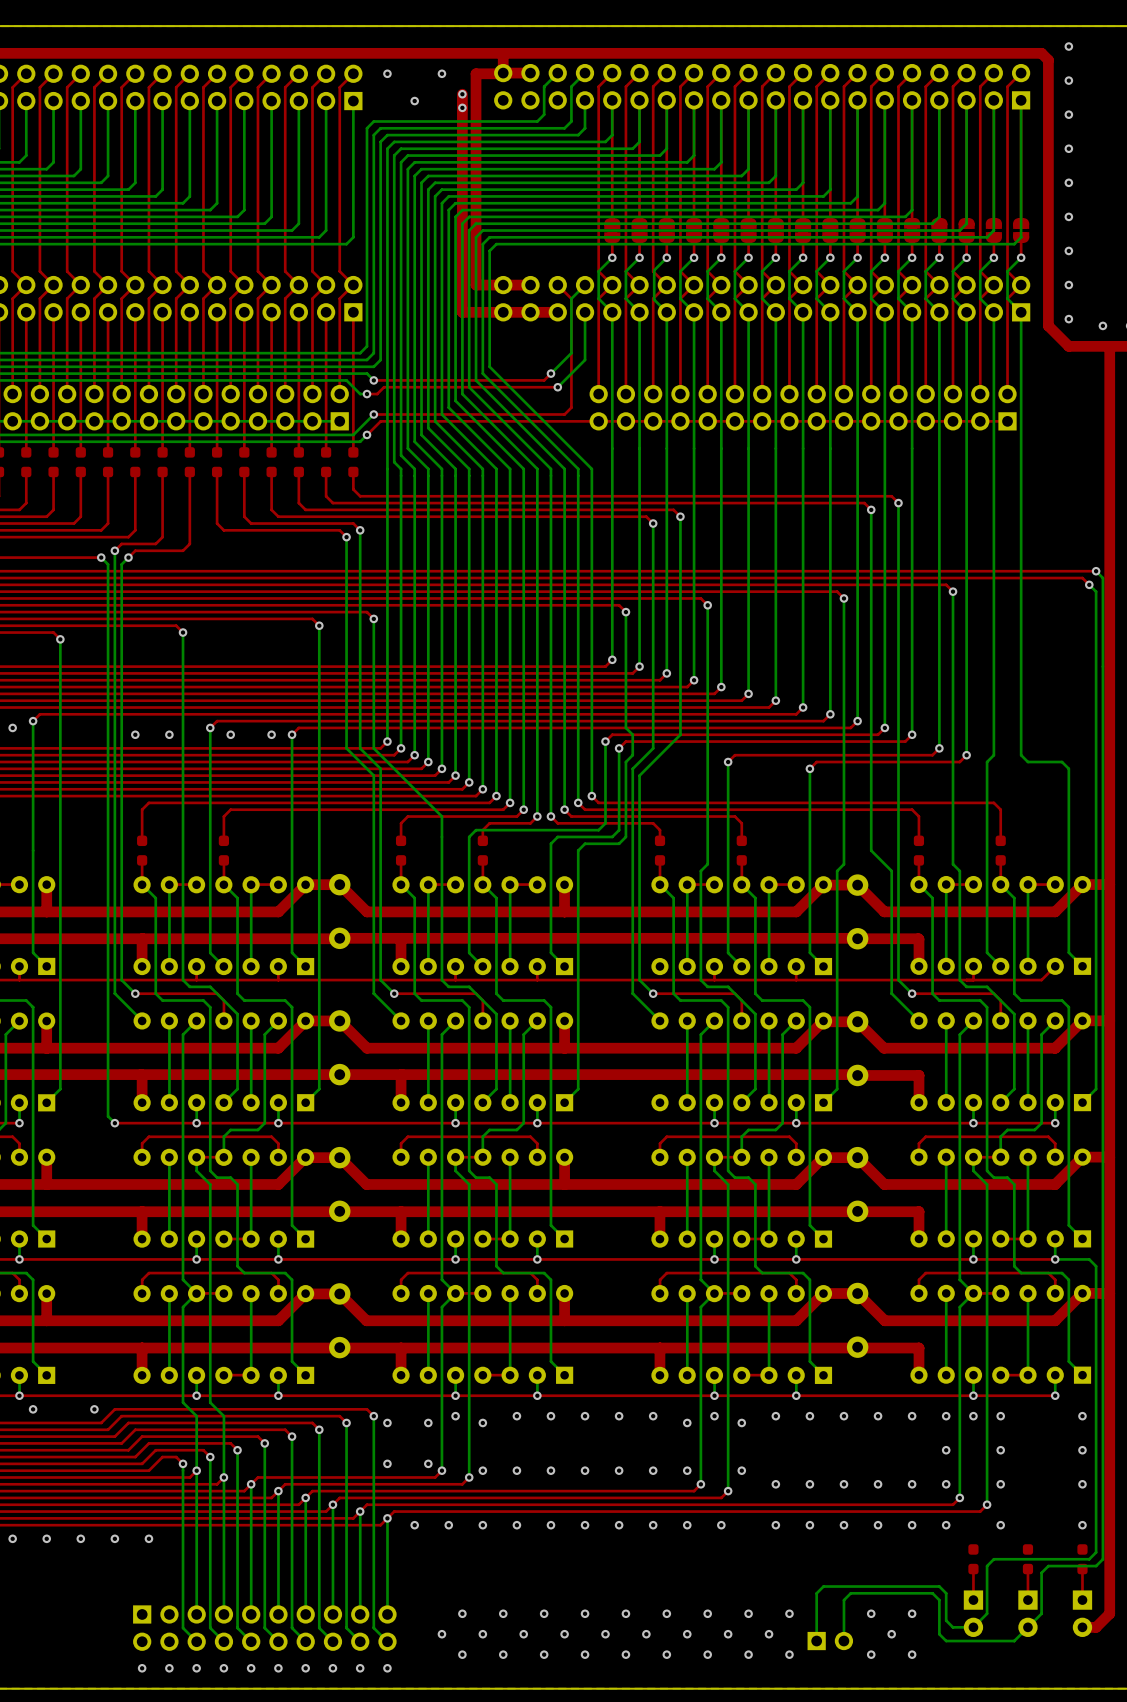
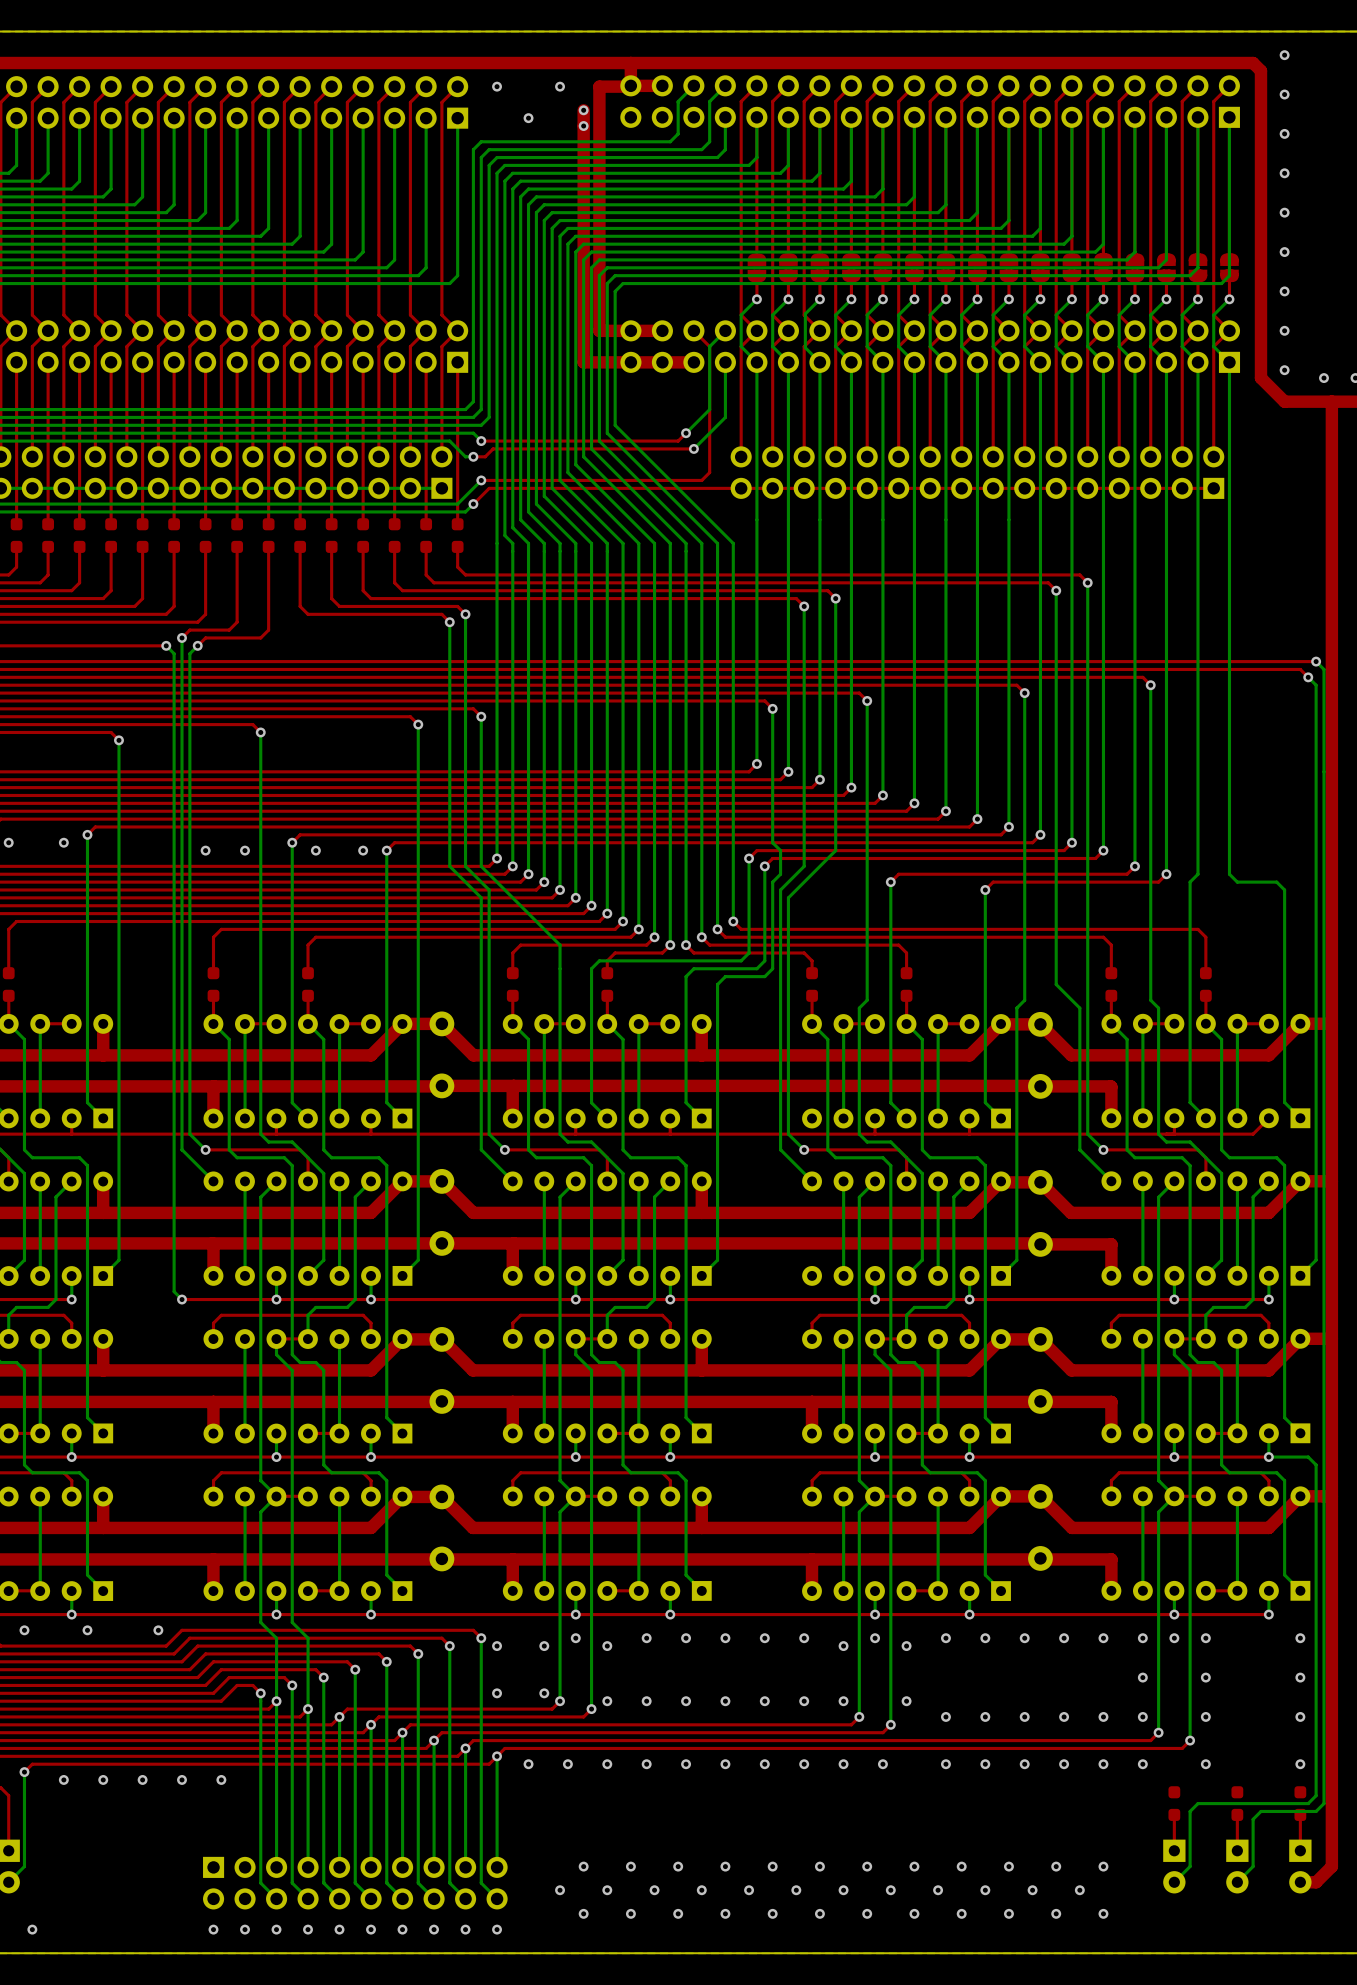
via: none -> (1008, 1866)
bottom track: (953, 1627) (946, 1620) (946, 1593) (939, 1586) (823, 1586) (816, 1593) (816, 1641) -> none
bottom track: (973, 1627) (953, 1627) -> none
bottom track: (1027, 1627) (1014, 1640) (946, 1641) (939, 1634) (939, 1600) (932, 1593) (850, 1593) (843, 1600) (843, 1640) -> none
via: none -> (985, 1890)
via: none -> (1032, 1890)
part: (830, 1641) -> none
via: none -> (1008, 1913)

